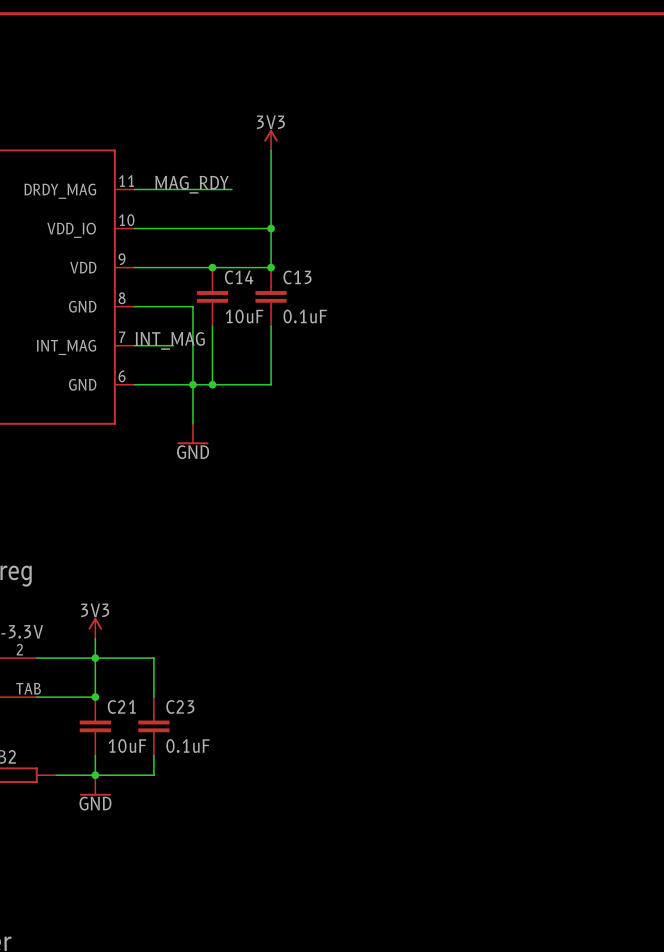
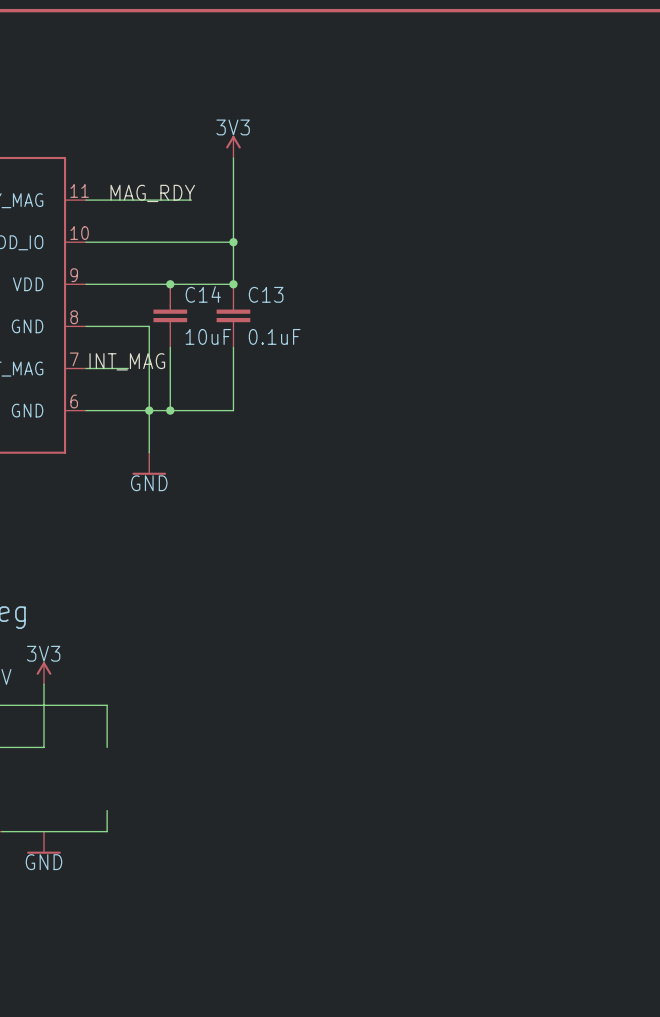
junction: (95, 658) -> none
junction: (95, 697) -> none
C21: 10uF (95, 726) -> none
C23: 0.1uF (153, 726) -> none
wire: (95, 755) (95, 775) -> none
junction: (95, 775) -> none

